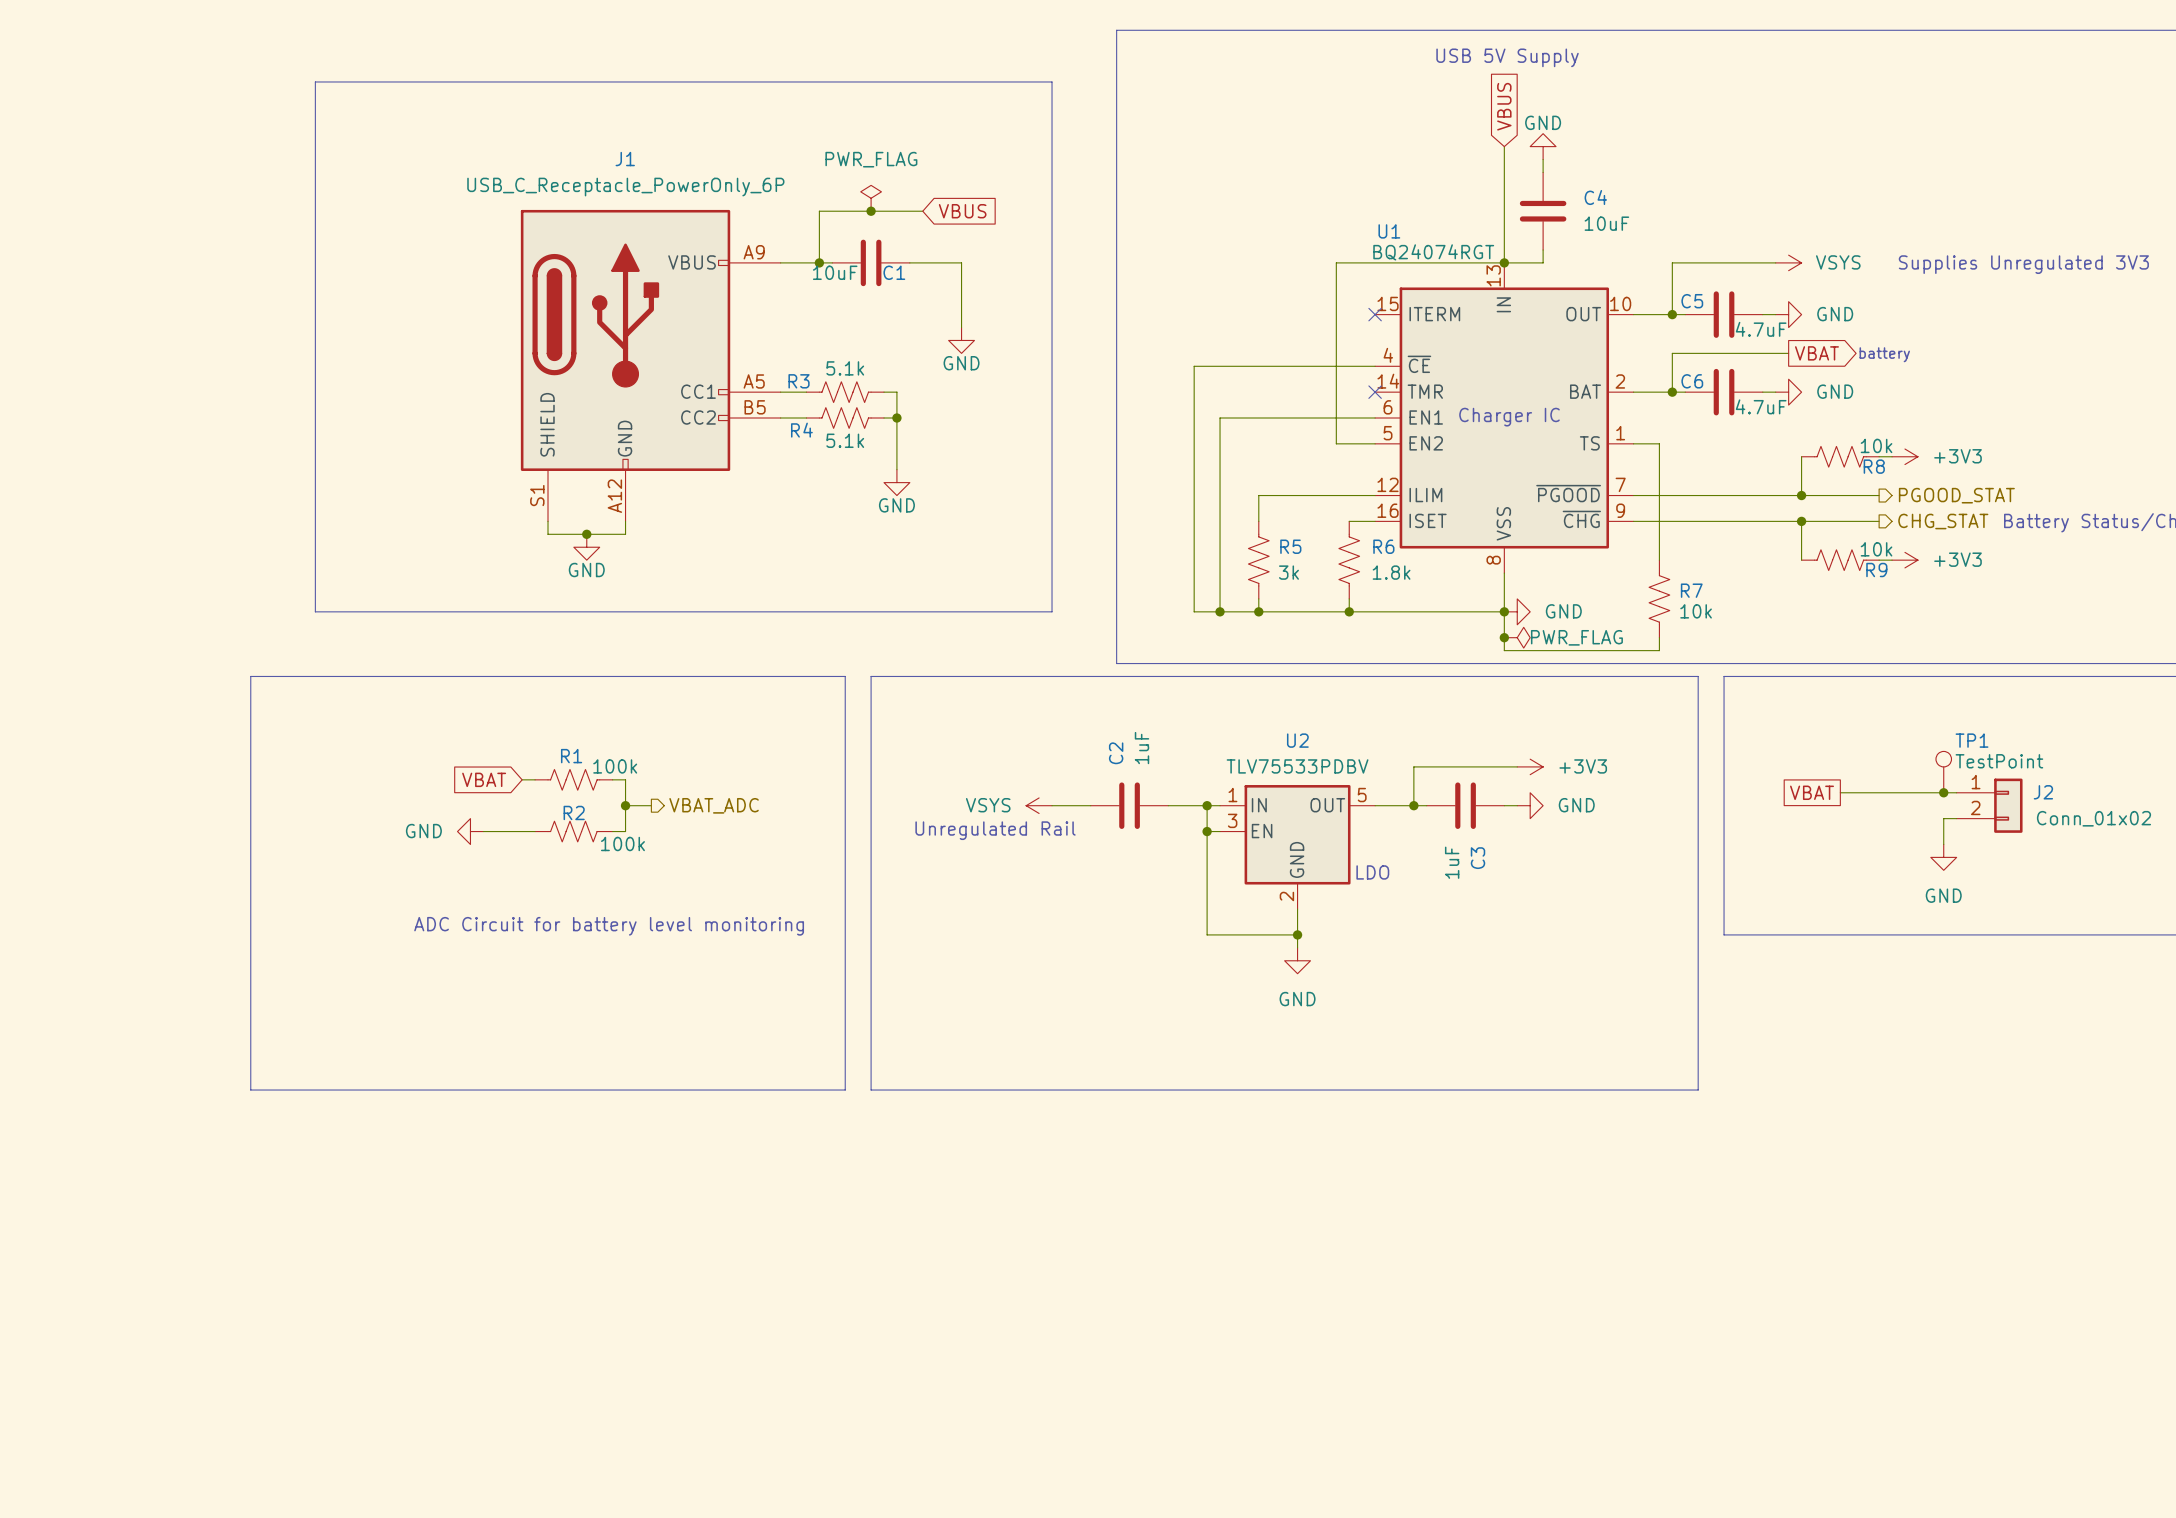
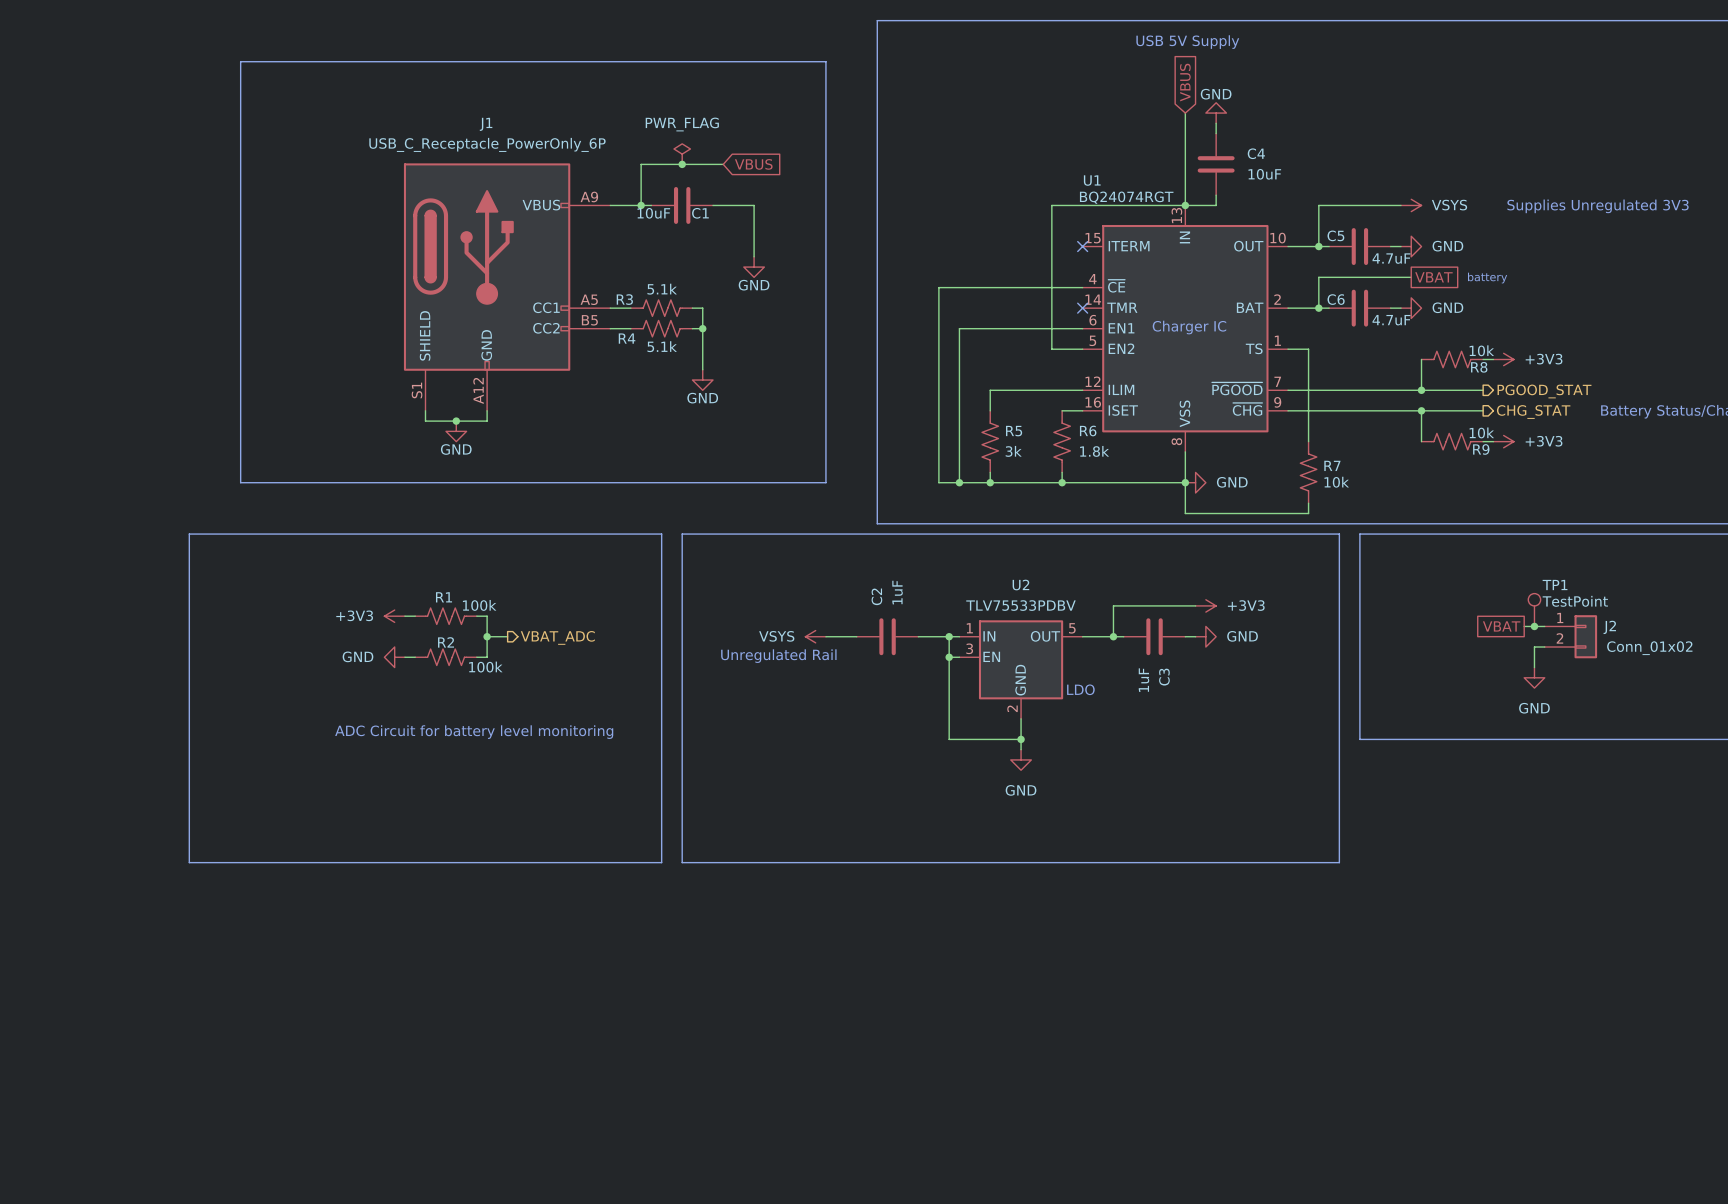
global label shape: output (1816, 353) -> passive (1433, 277)
junction: (1504, 637) -> none
power symbol: PWR_FLAG (1517, 637) -> none
global label: VBAT (484, 779) -> none
power symbol: none -> +3V3 (394, 616)
global label position: VBAT (1812, 792) -> VBAT (1501, 626)
wire: (1840, 792) (1930, 792) -> none
power symbol position: GND (470, 831) -> GND (394, 657)
wire: (483, 831) (522, 831) -> none

